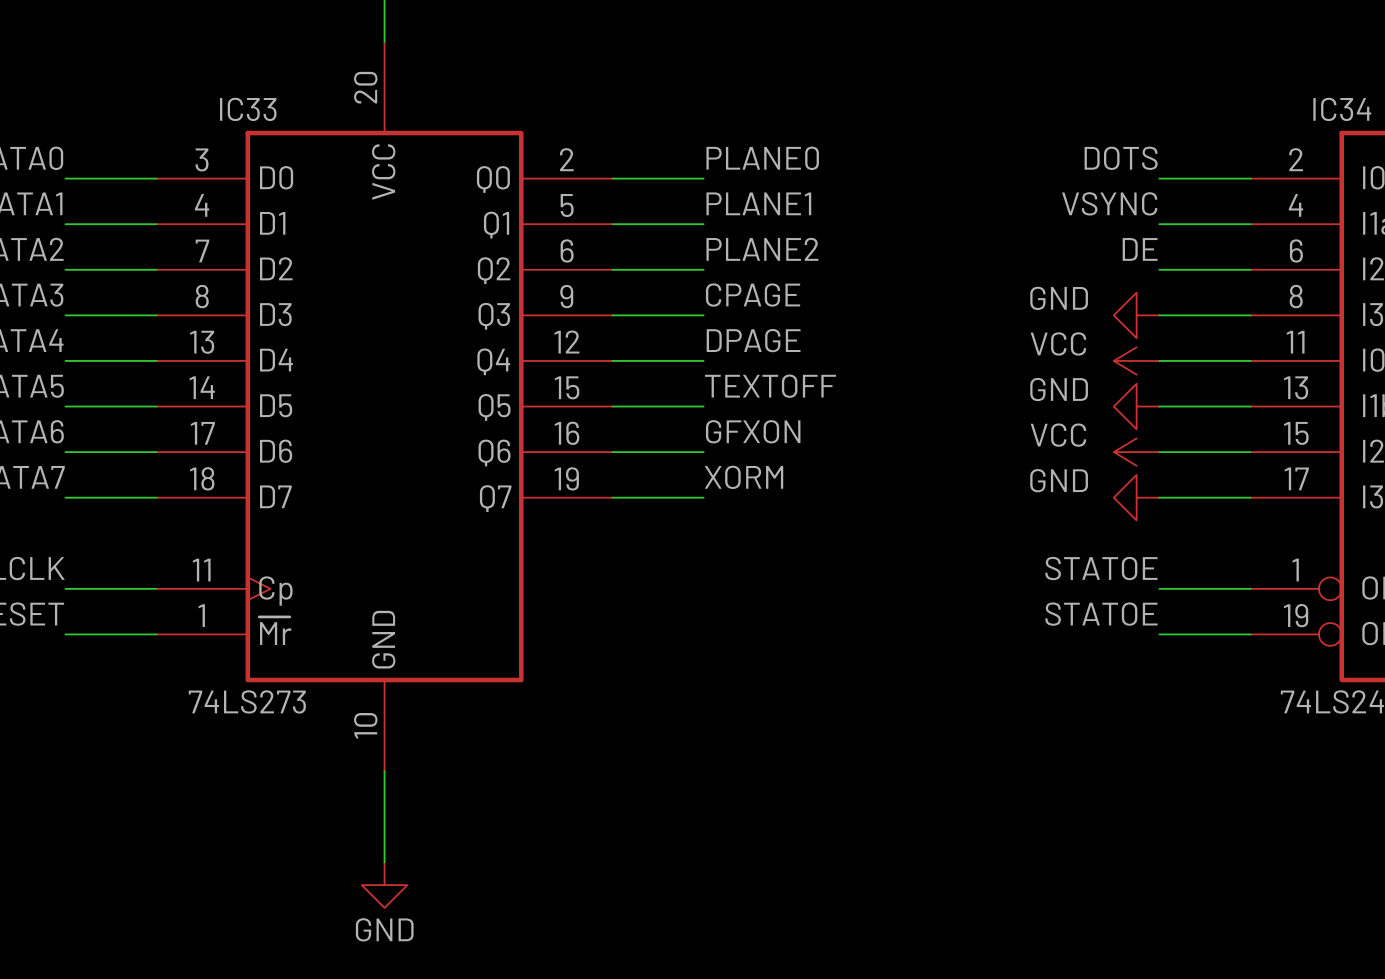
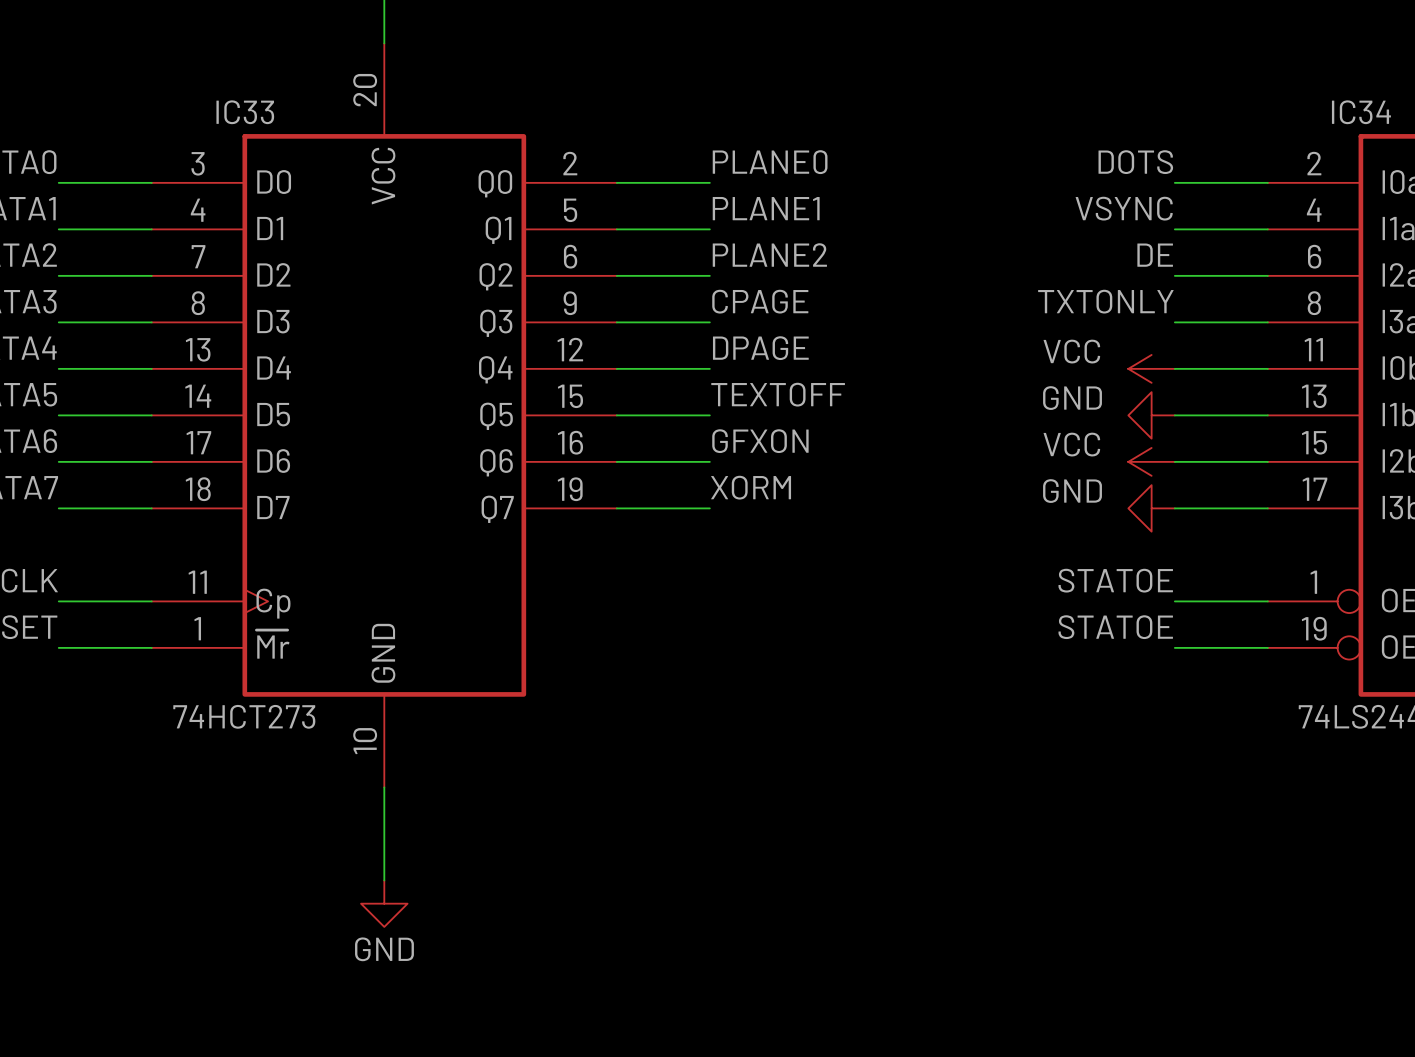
label: none -> TXTONLY (1105, 301)
power symbol: GND (1136, 315) -> none
IC33 value: 74LS273 (247, 701) -> 74HCT273 (244, 716)

